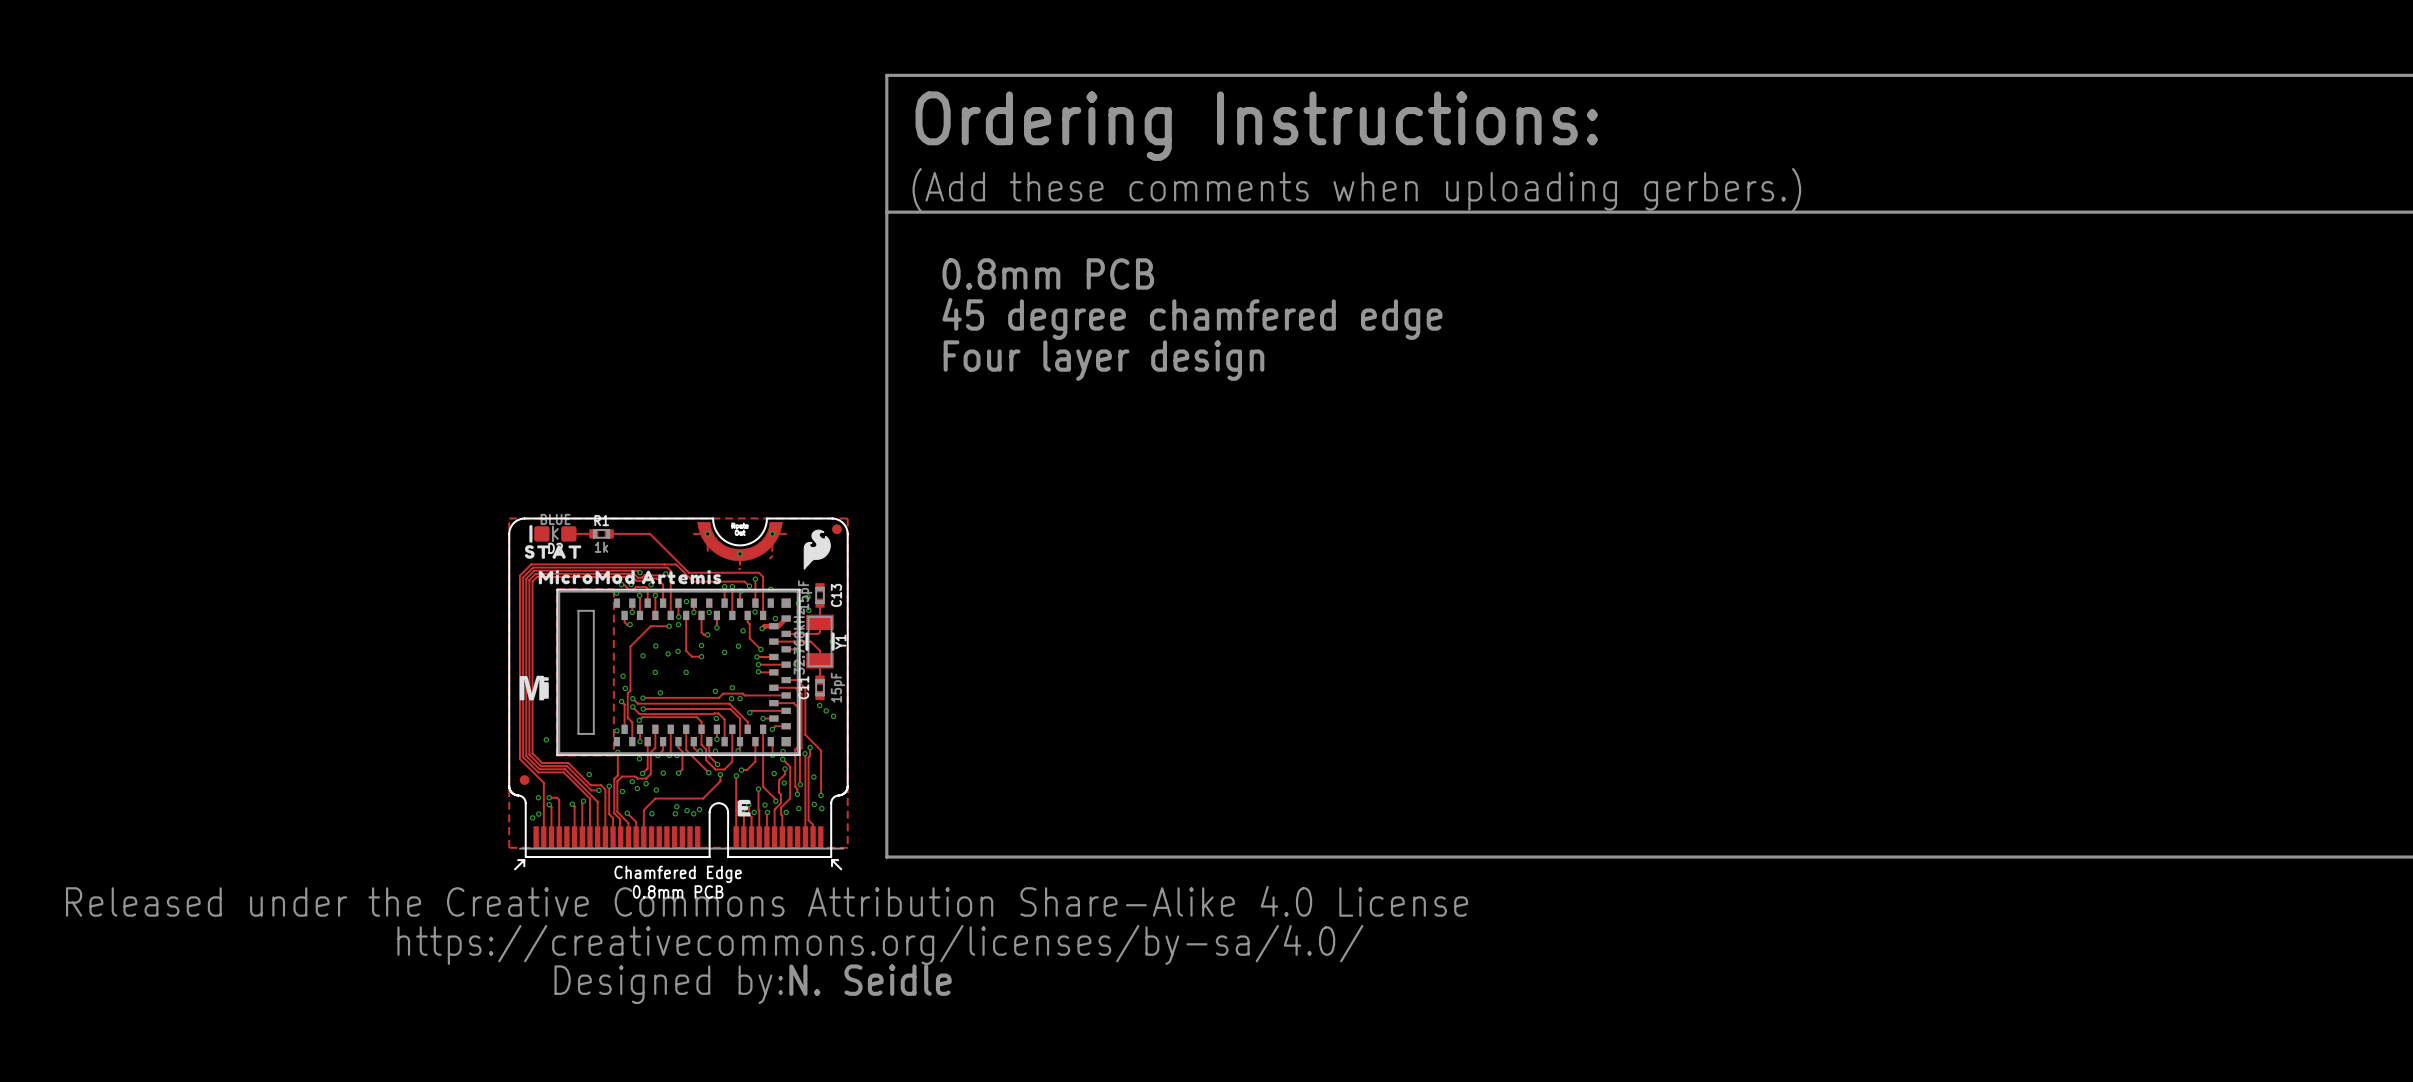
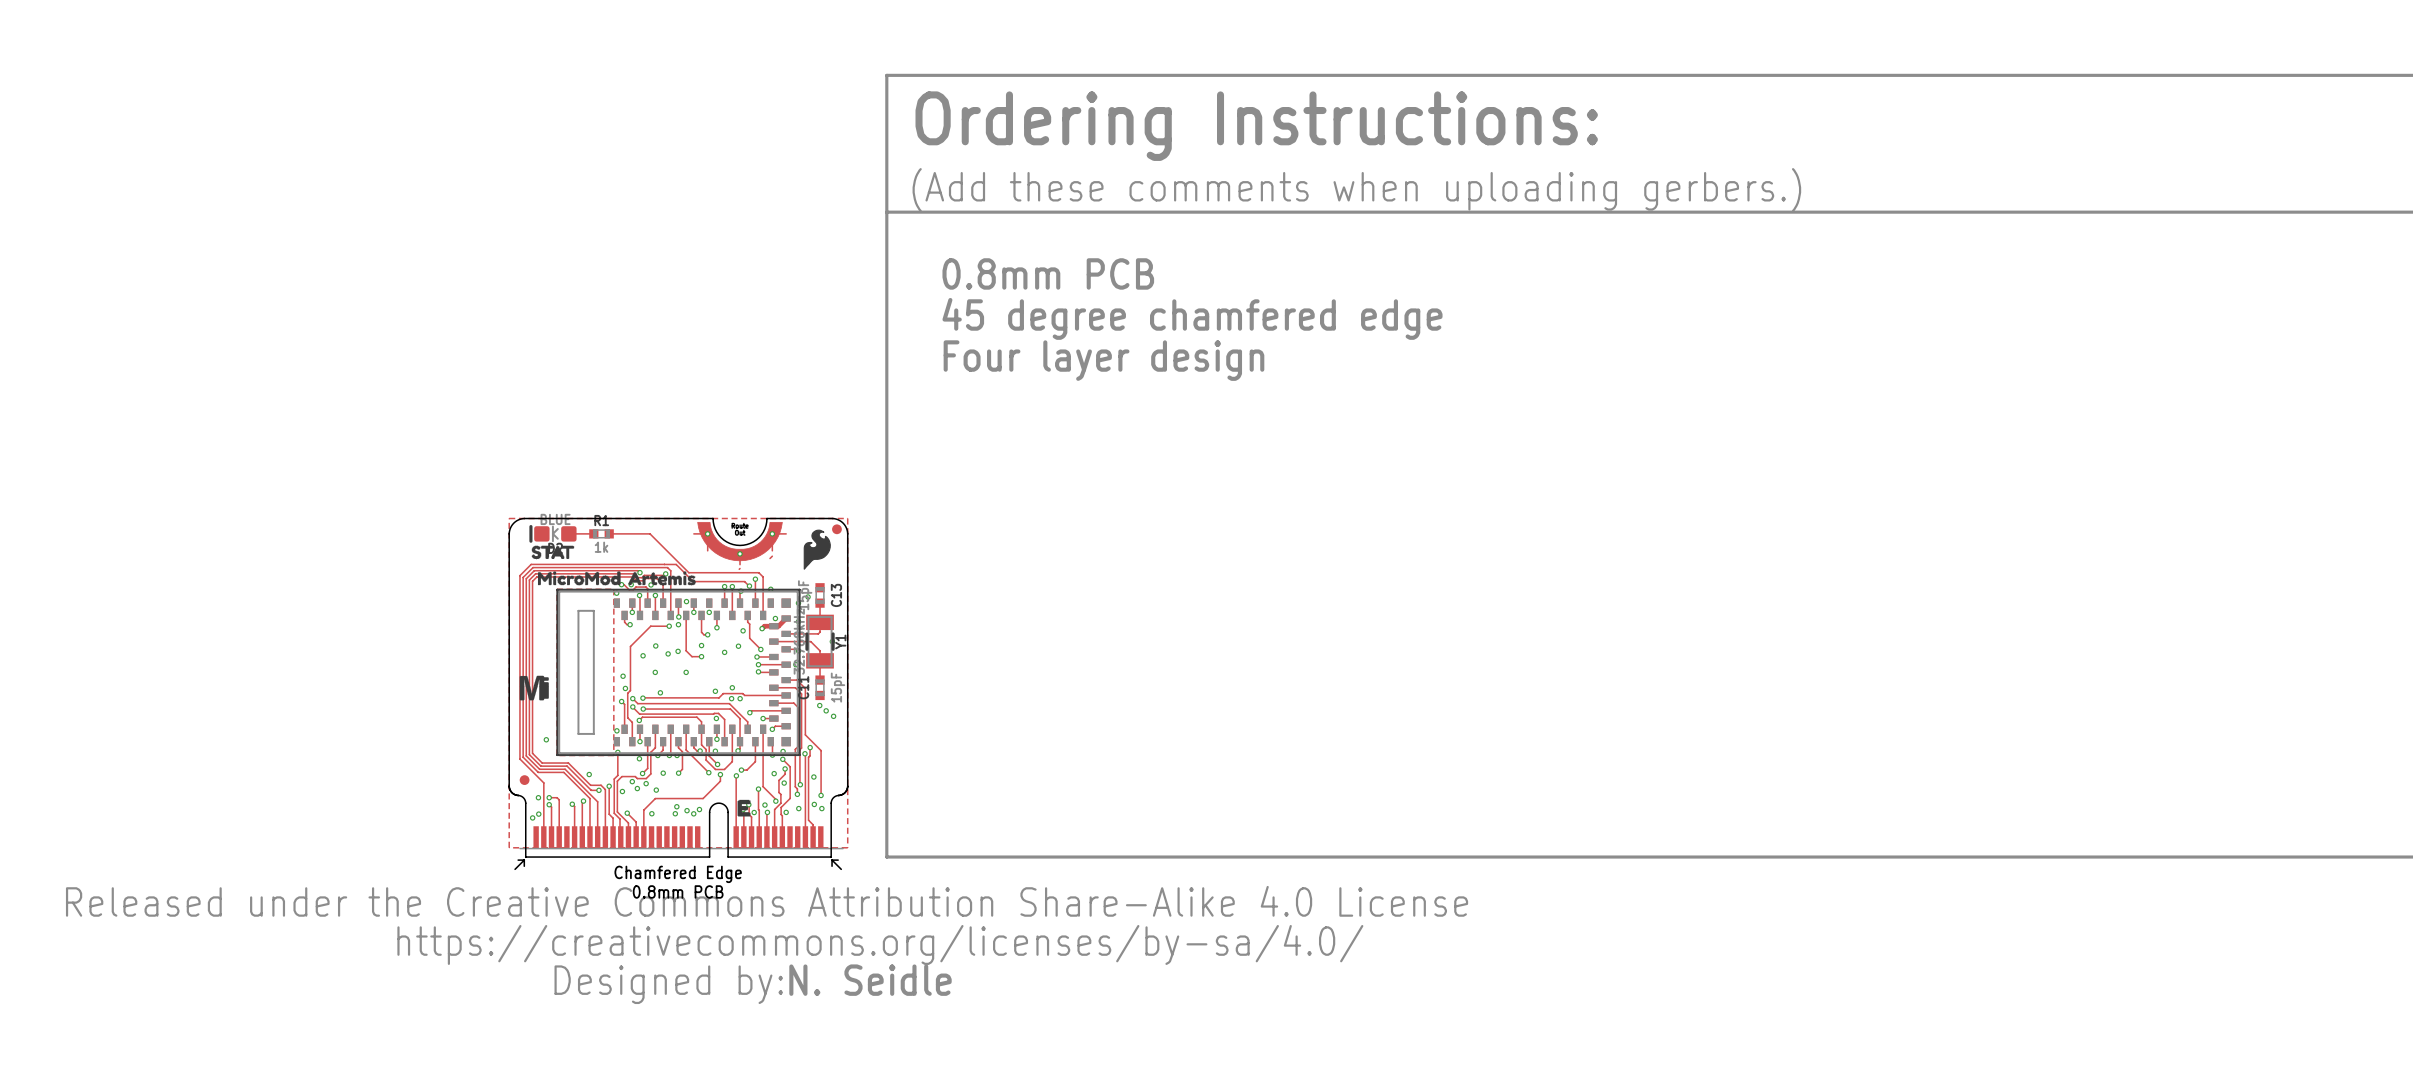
drawing shape: [524, 545, 582, 559] -> [531, 545, 575, 560]
drawing: [538, 570, 722, 585] -> none
drawing: none -> [537, 571, 696, 586]
via: (808, 610) -> none
via: (755, 612) -> none

